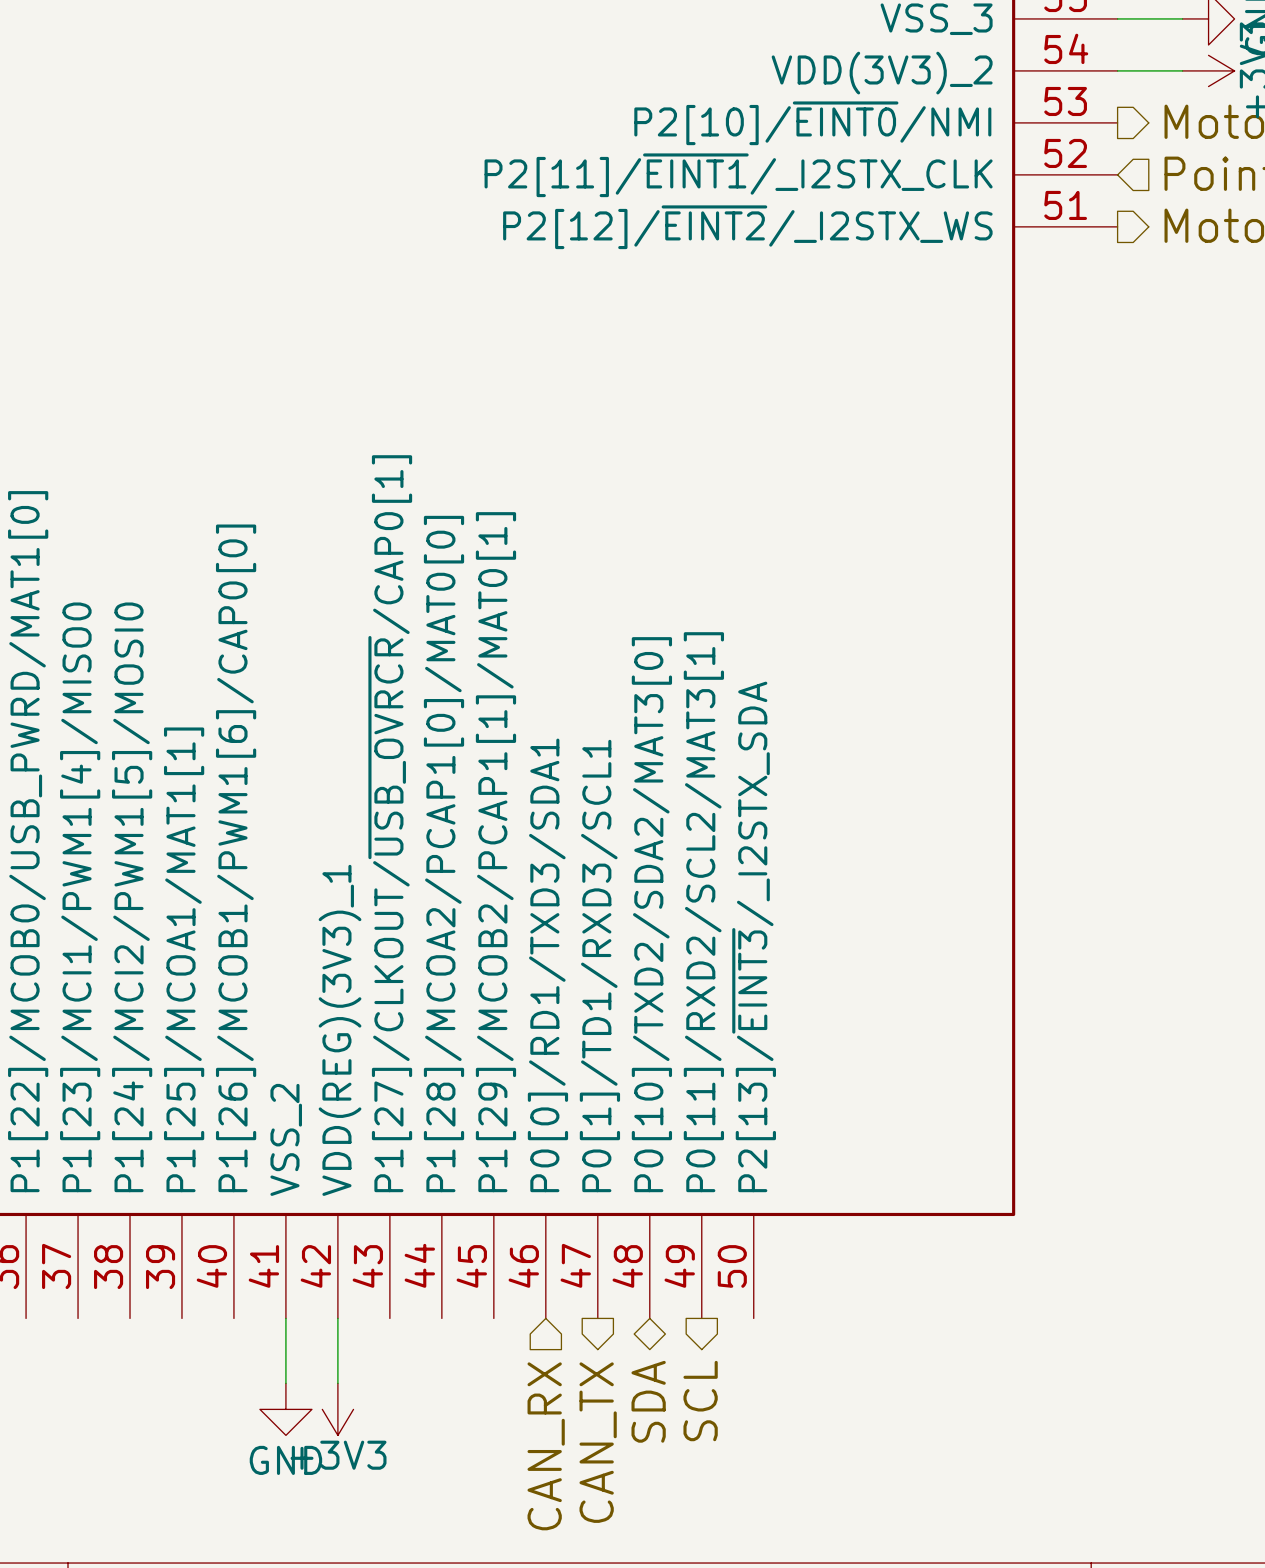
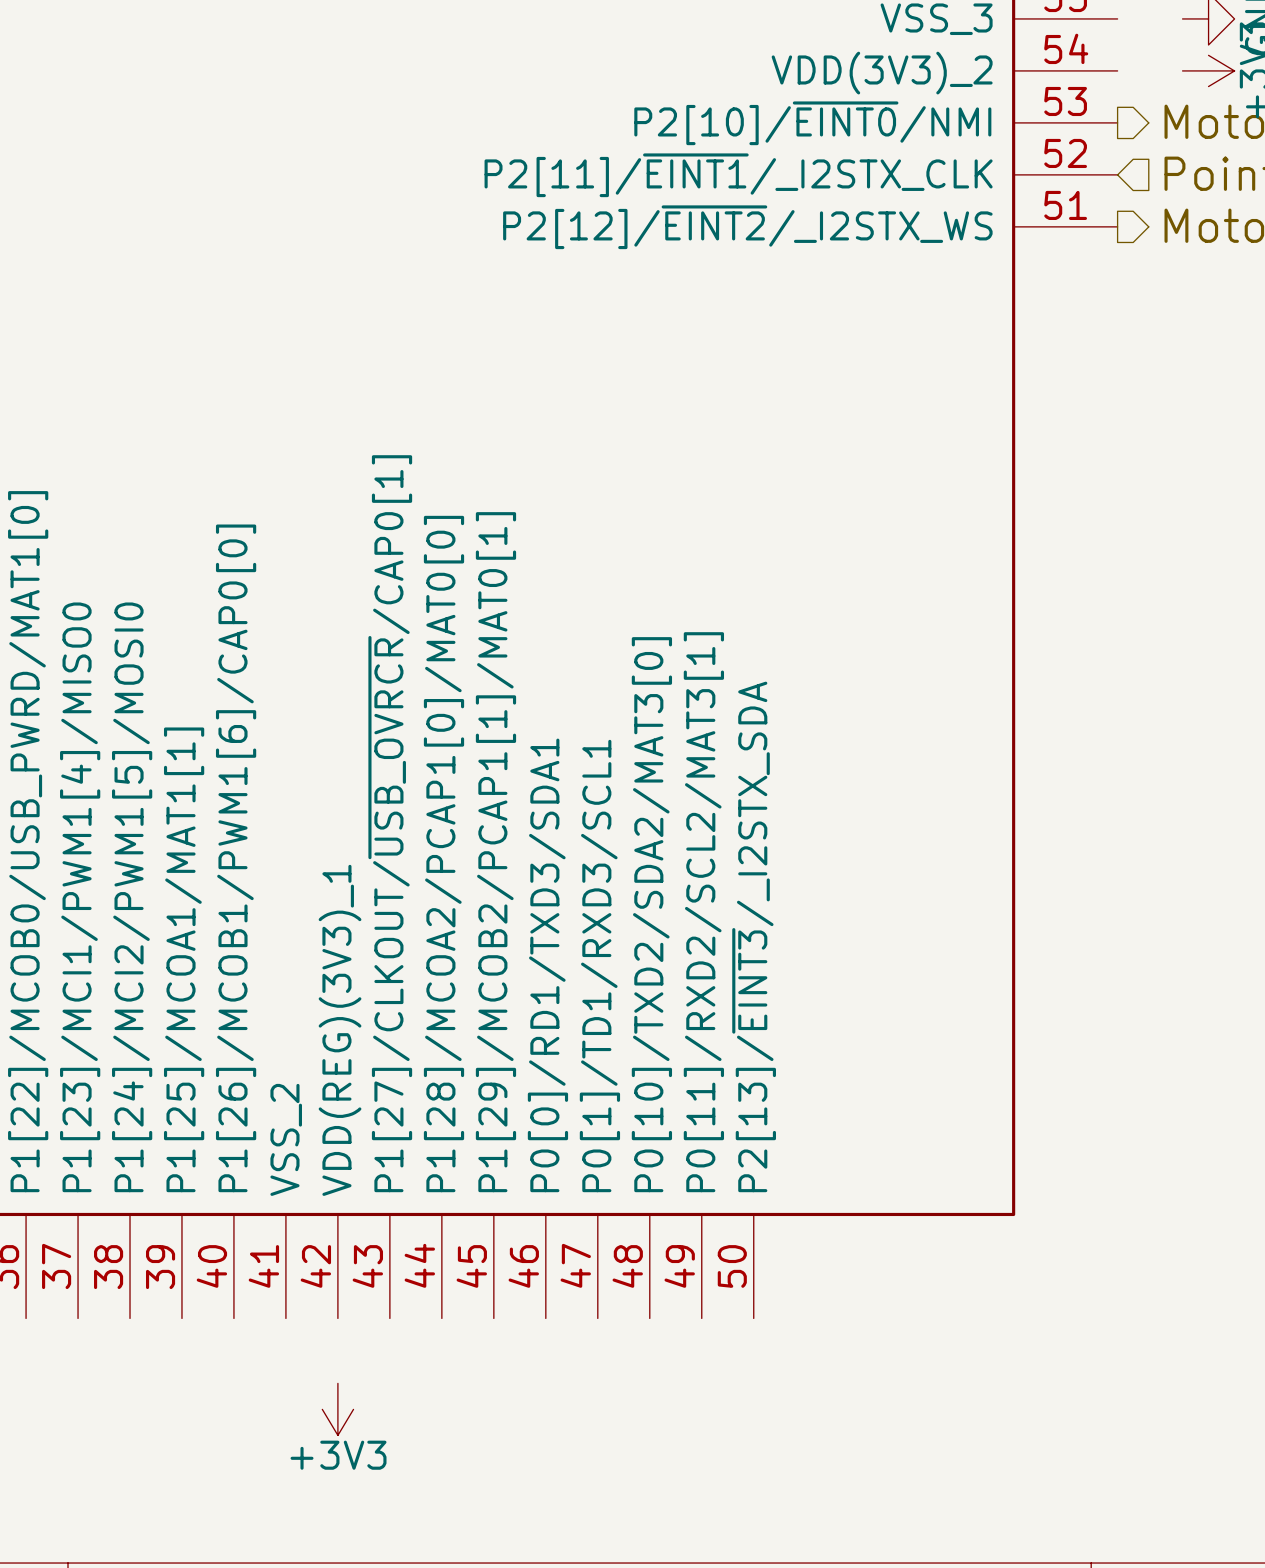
wire: (1117, 18) (1182, 18) -> none
wire: (1117, 70) (1182, 70) -> none
wire: (285, 1318) (285, 1383) -> none
wire: (337, 1318) (337, 1383) -> none
hierarchical label: SDA (648, 1401) -> none
hierarchical label: SCL (700, 1401) -> none
power symbol: GND (285, 1409) -> none
hierarchical label: CAN_TX (598, 1442) -> none
hierarchical label: CAN_RX (546, 1446) -> none

